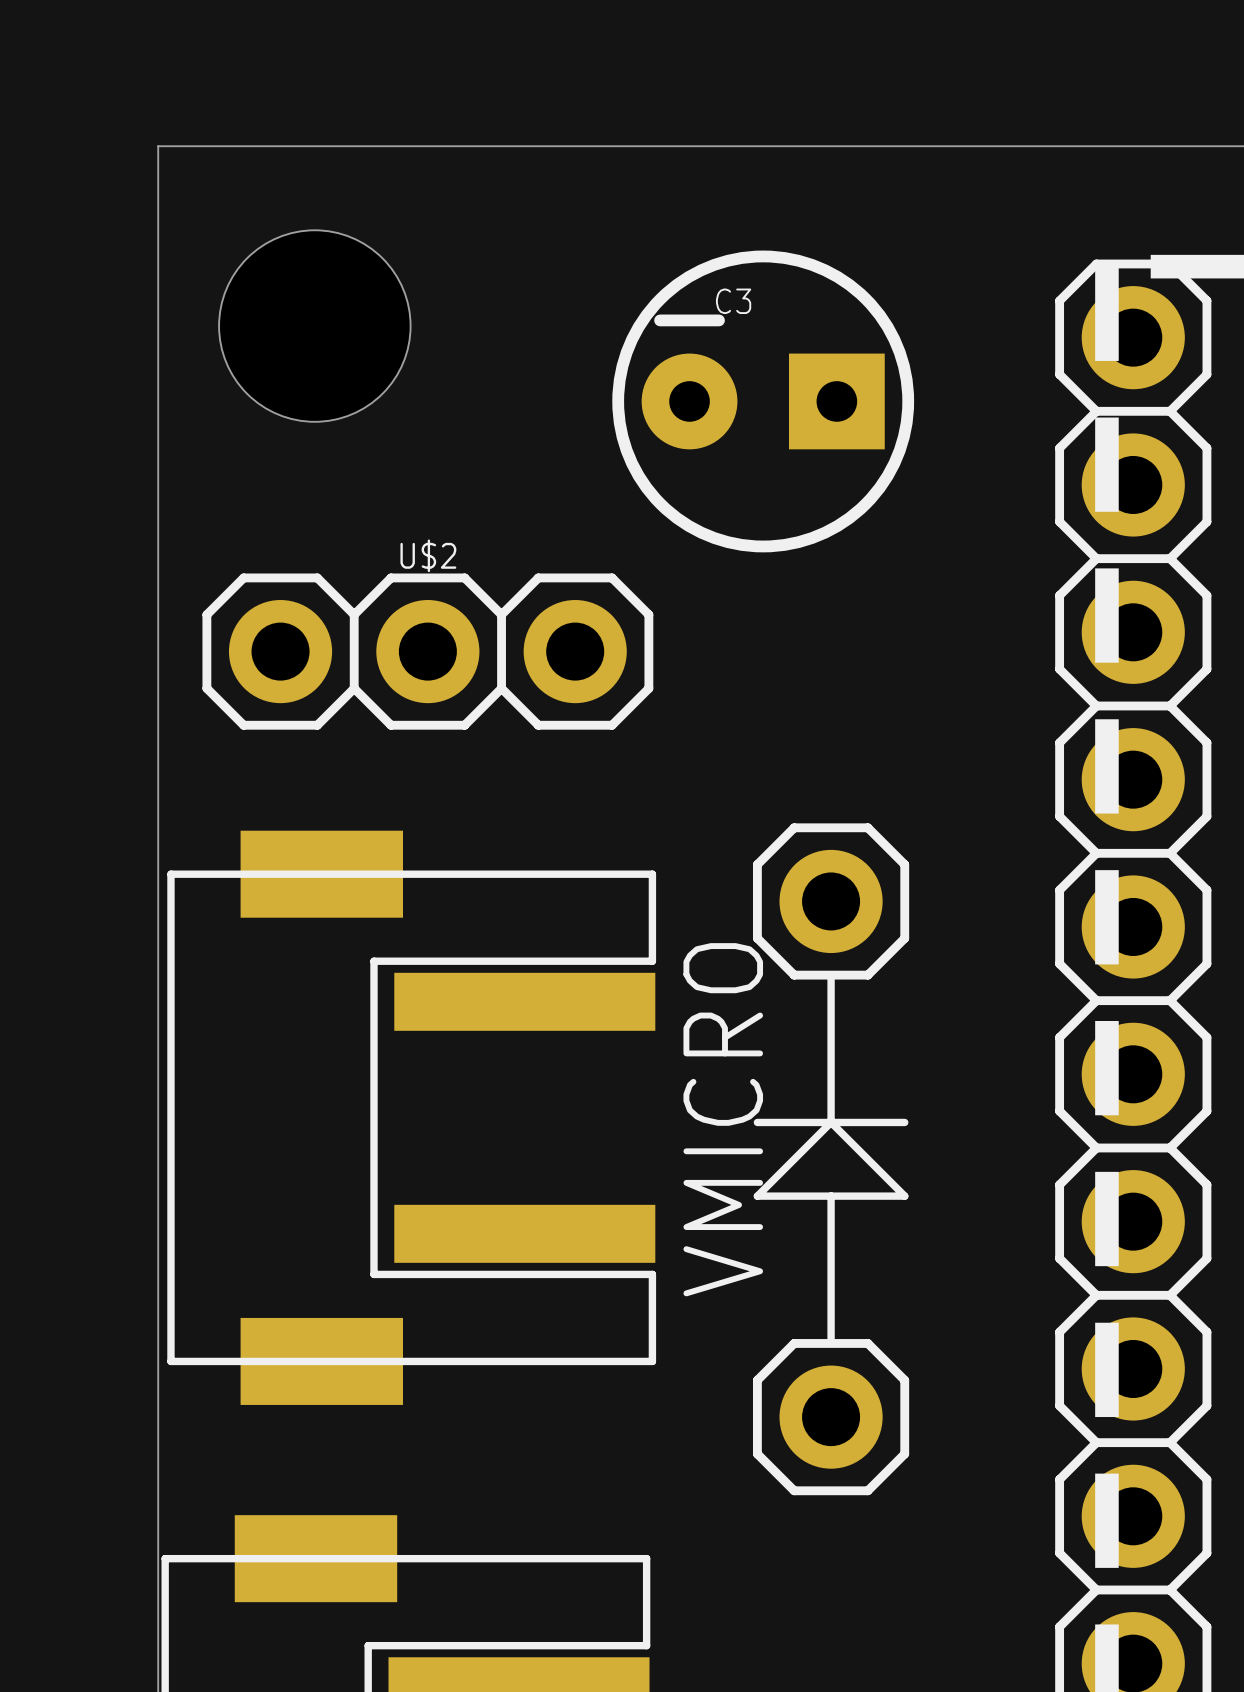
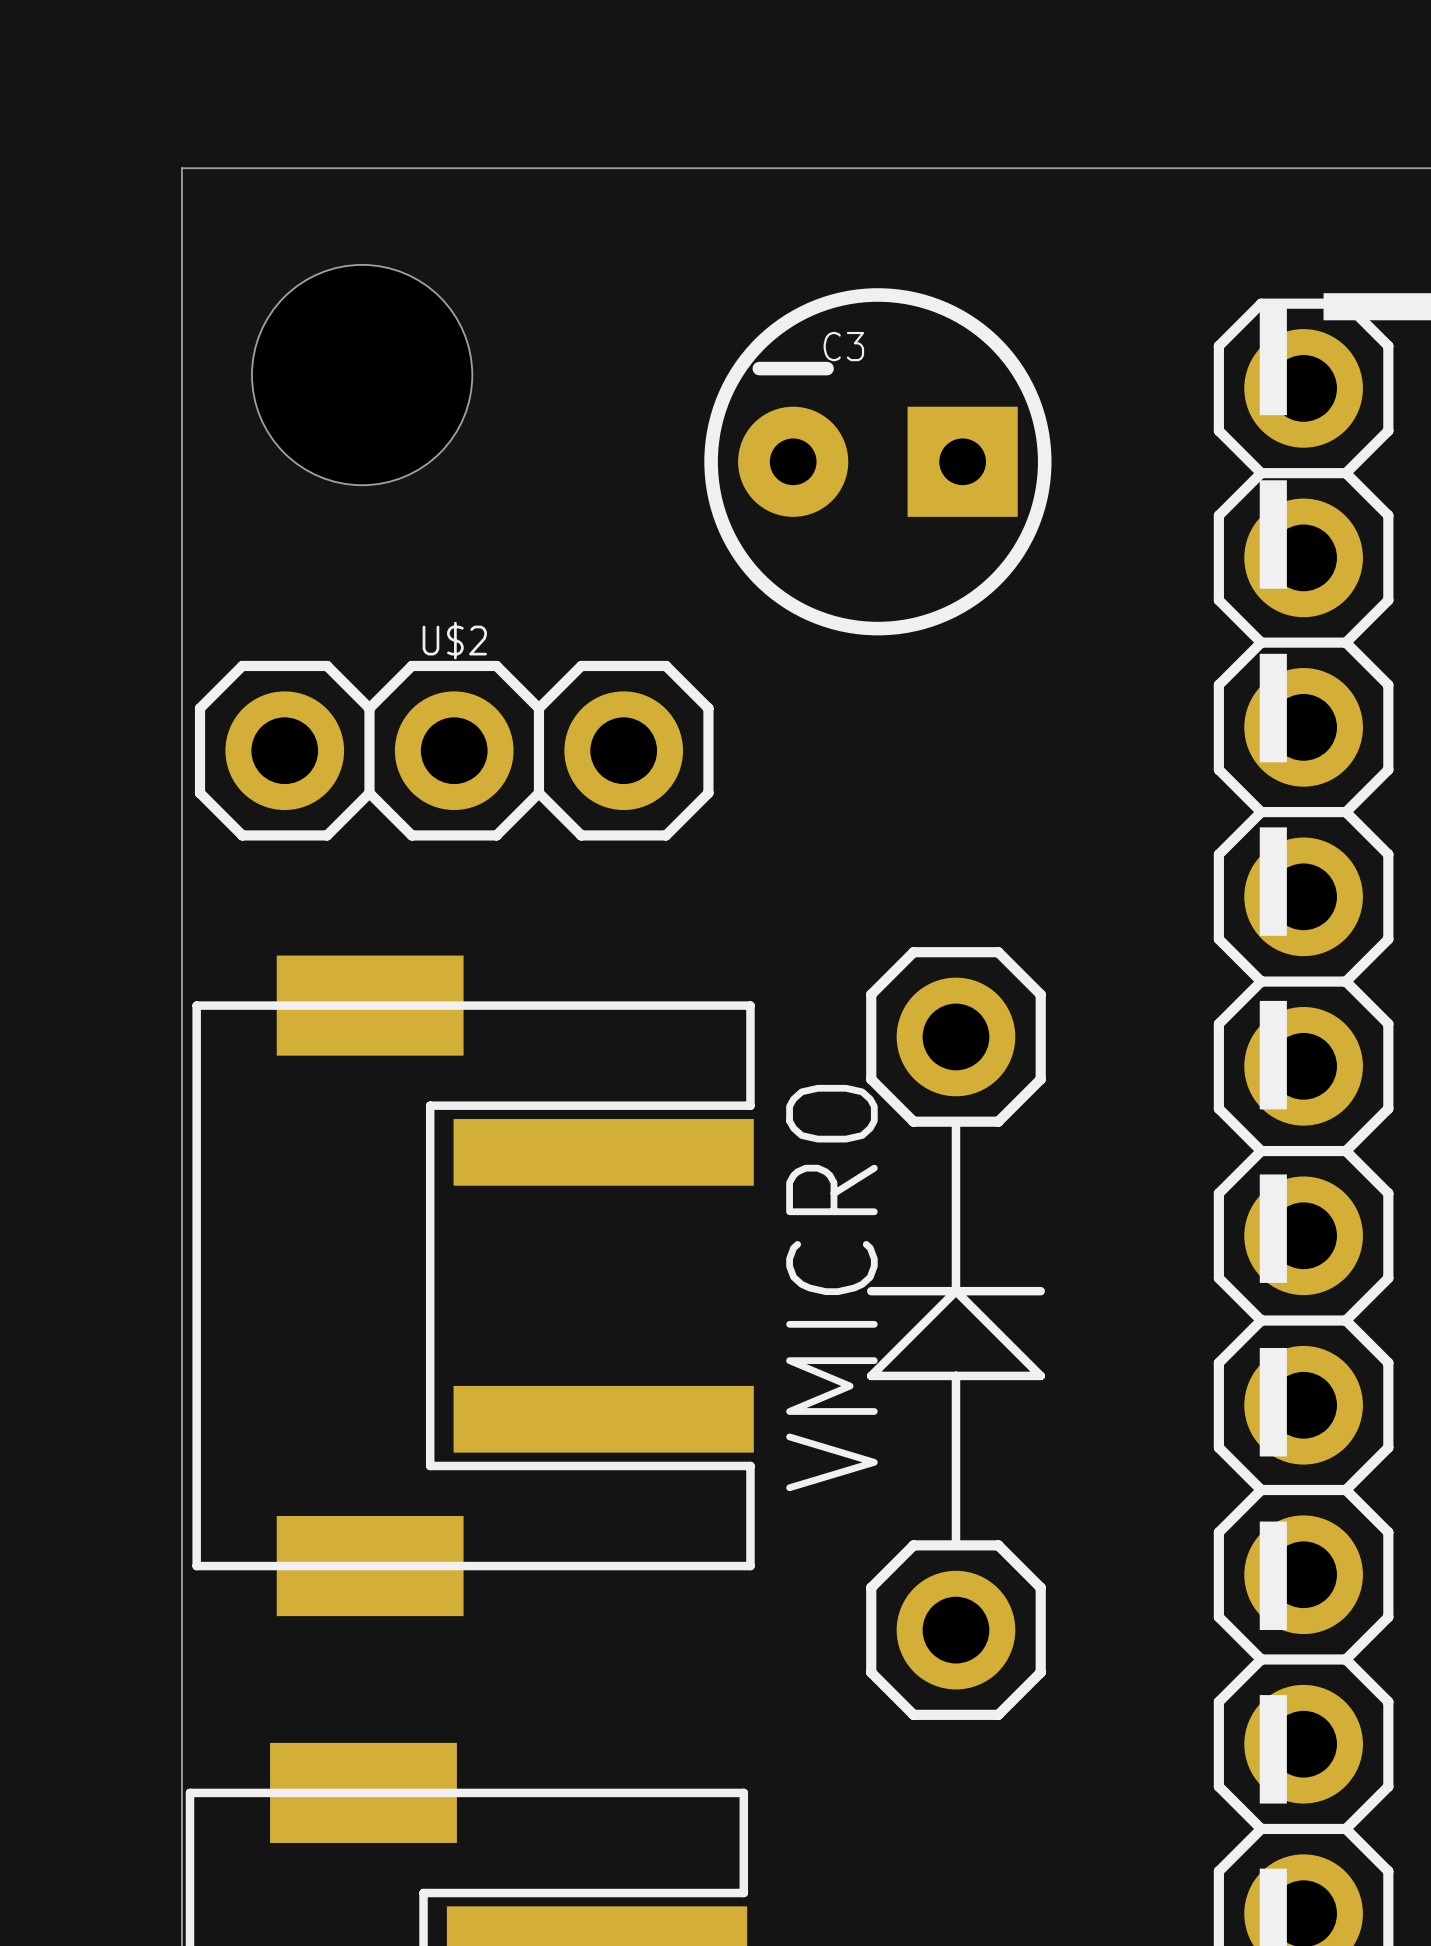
U$2 position: (427, 651) -> (454, 750)

